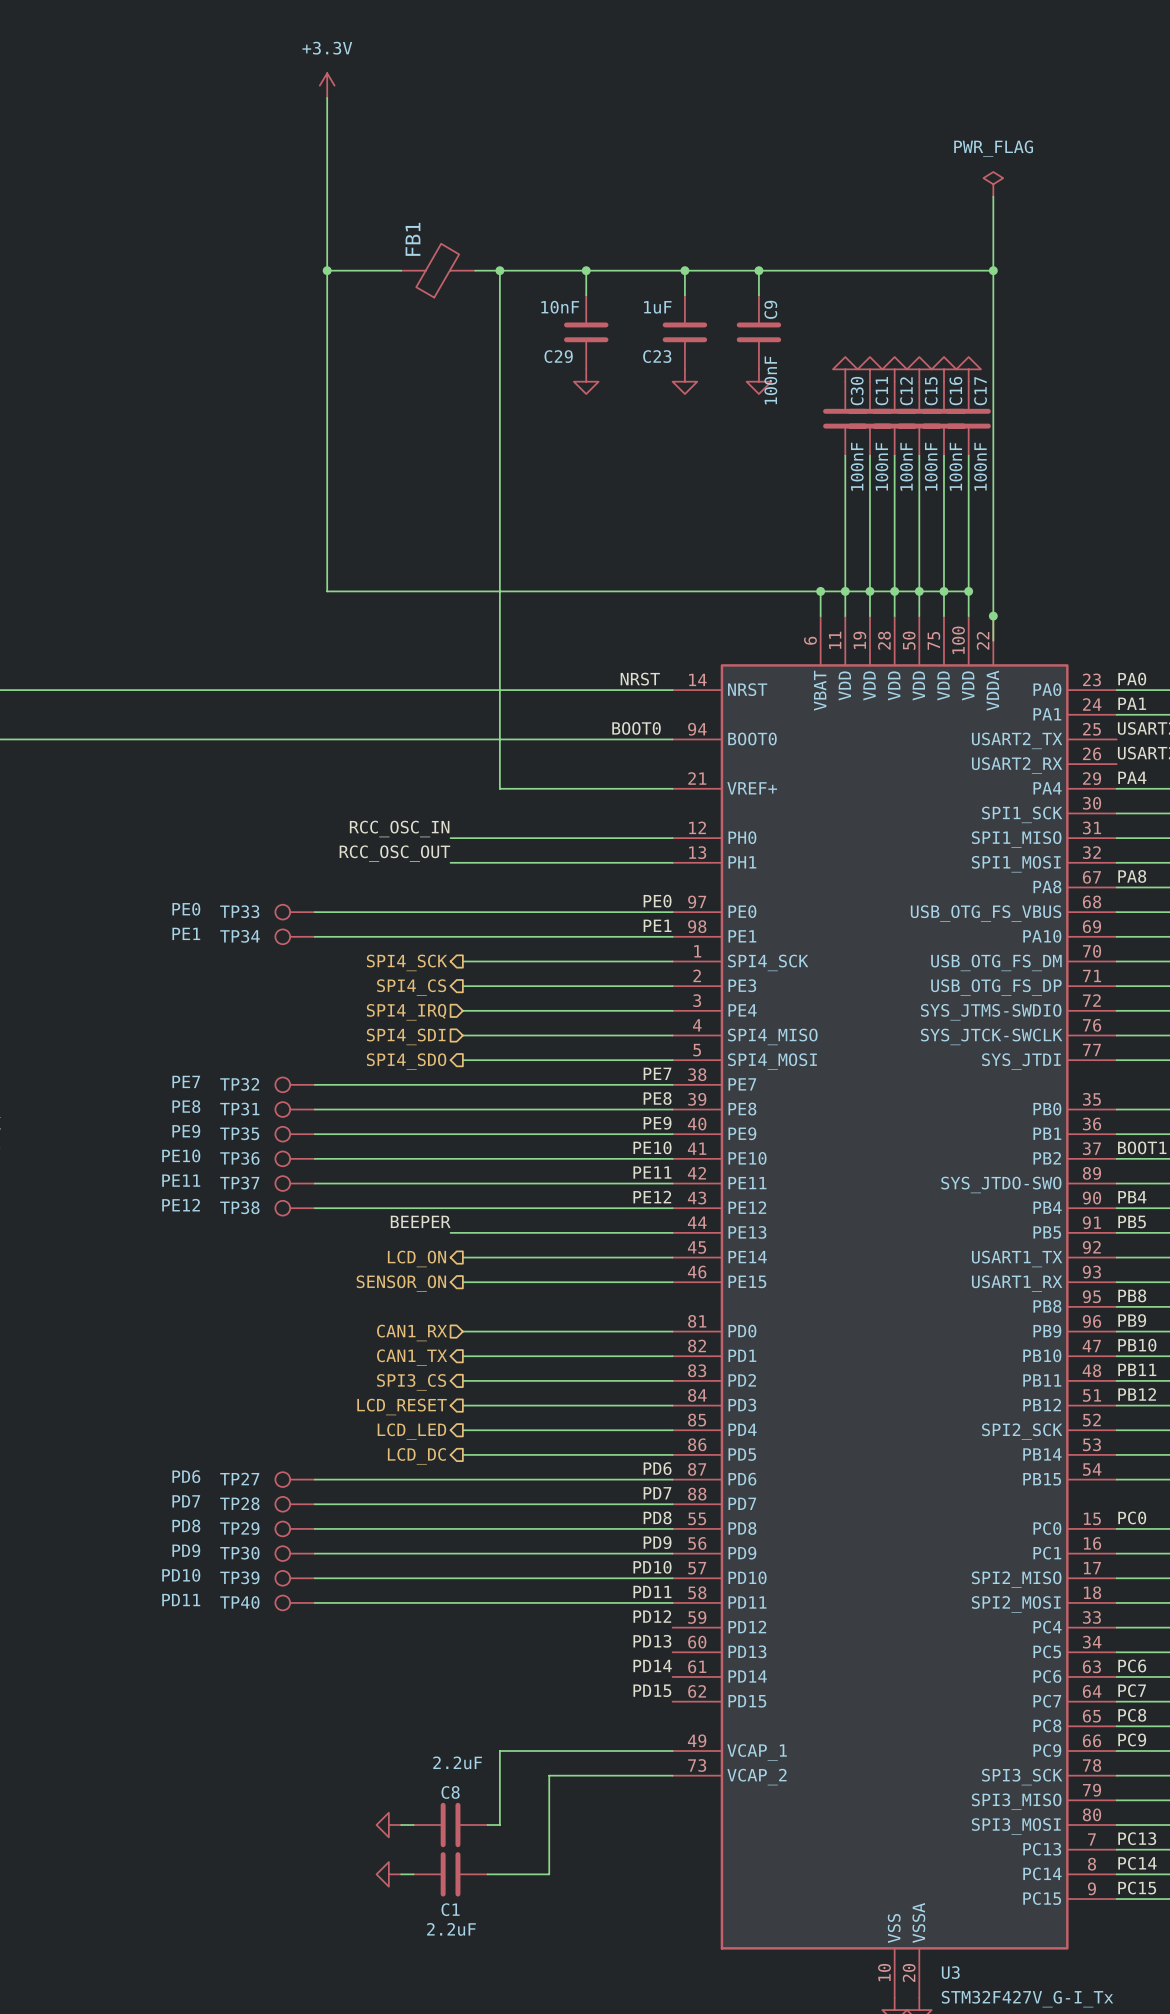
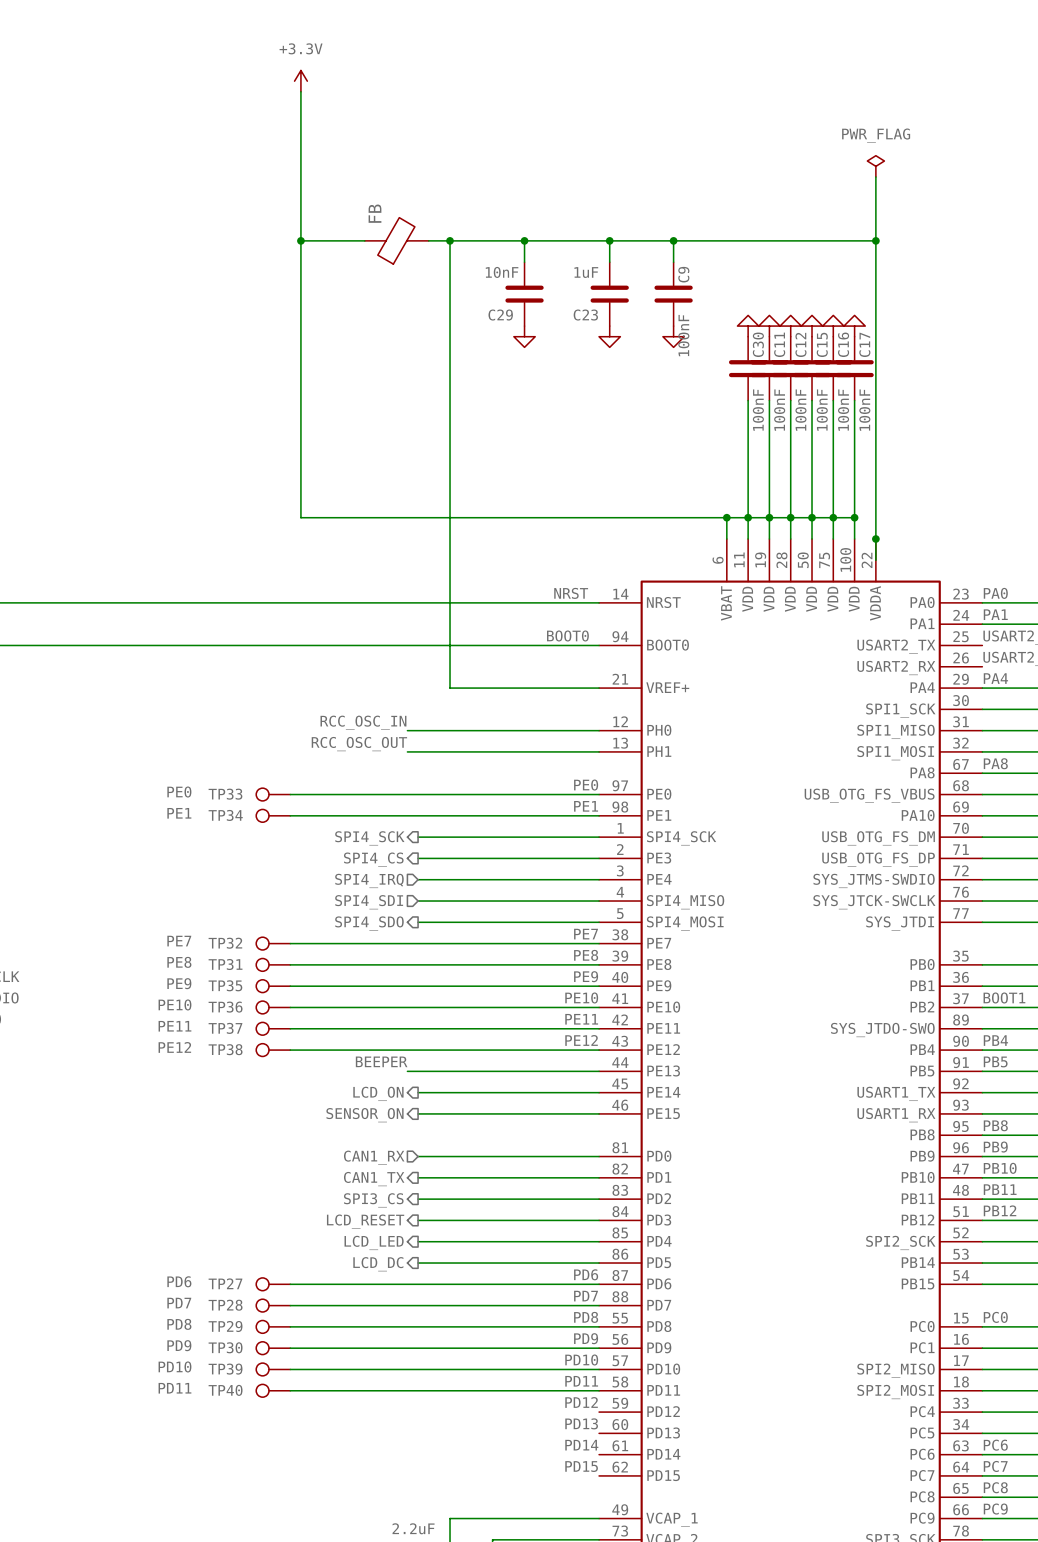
FB1 name: FB1 (412, 239) -> FB (374, 213)

